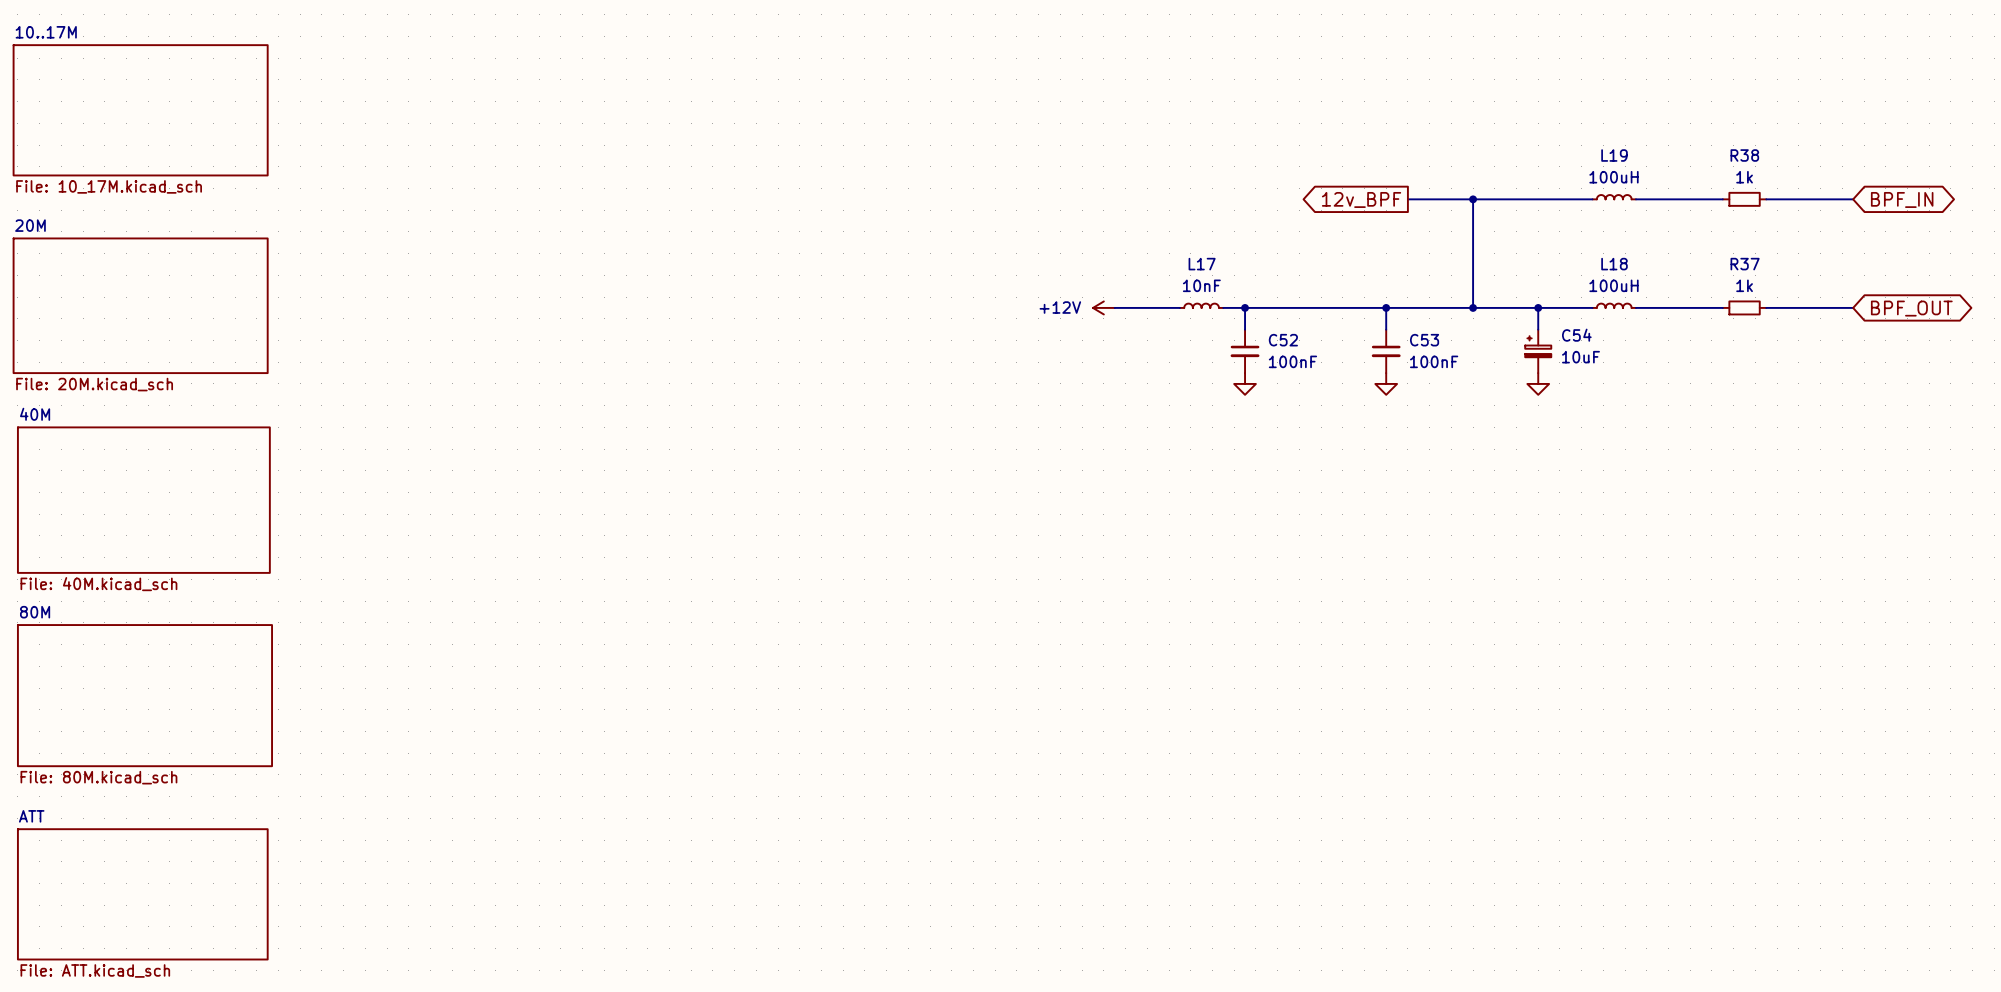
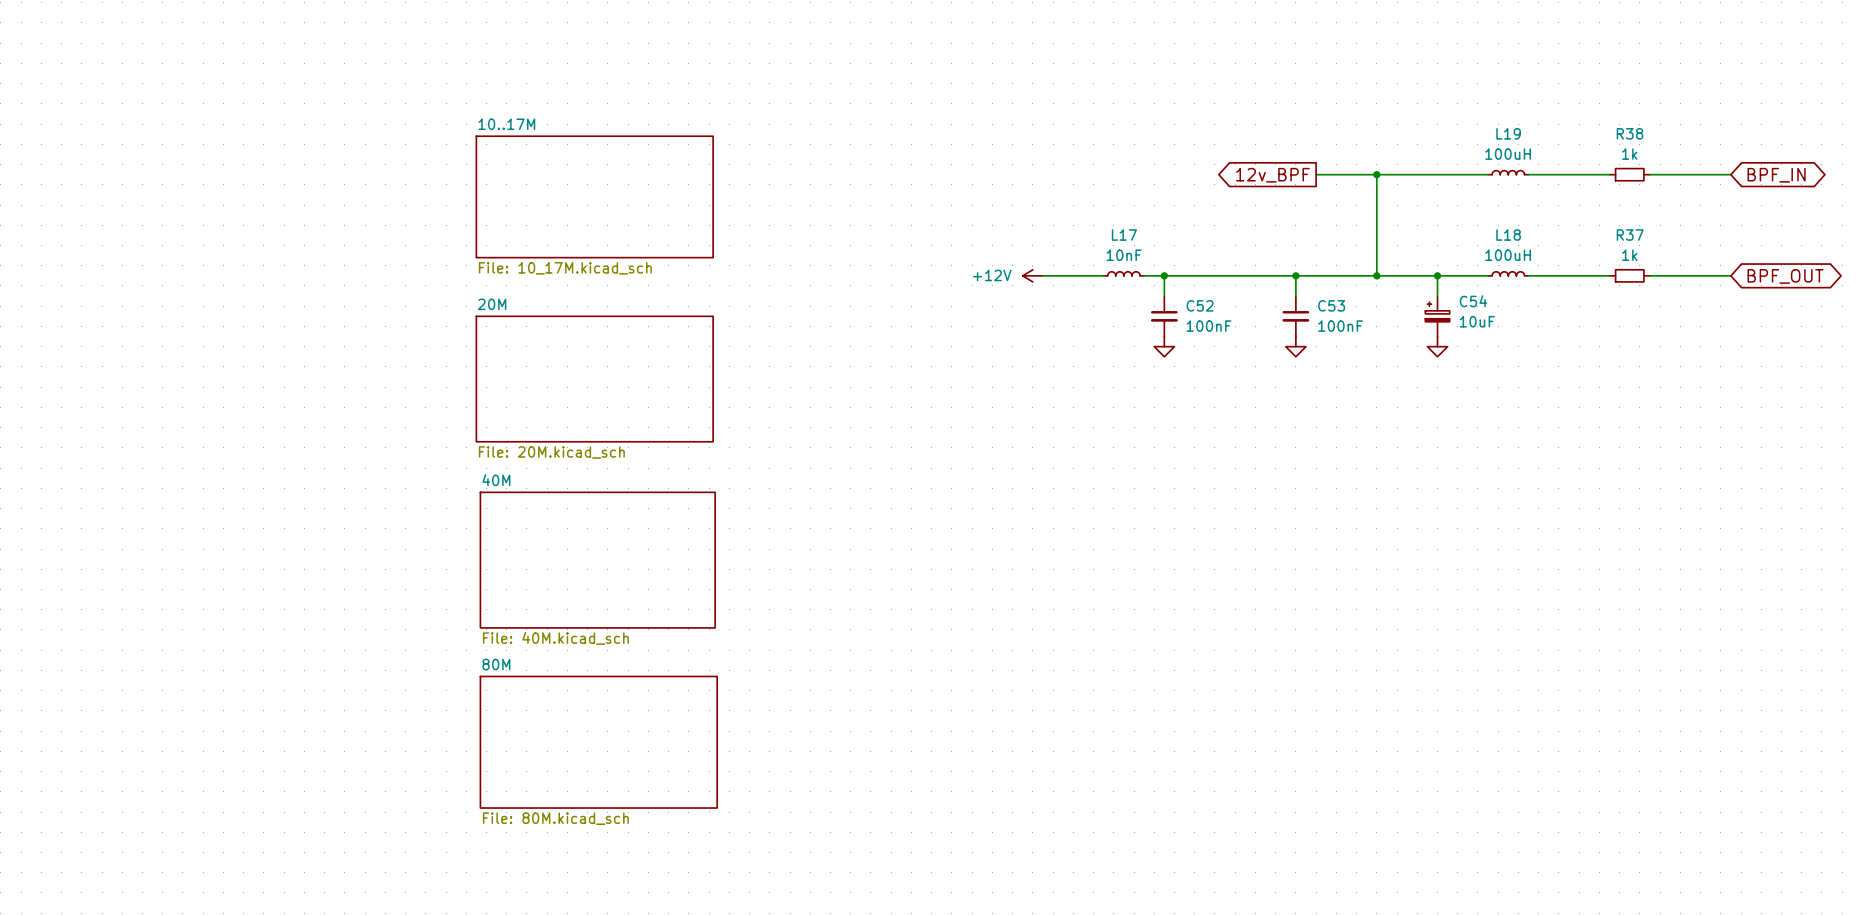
sheet 10..17M position: (140, 110) -> (594, 196)
sheet 20M position: (140, 305) -> (594, 379)
sheet 40M position: (143, 500) -> (597, 560)
sheet 80M position: (144, 695) -> (598, 742)
sheet ATT: File: ATT.kicad_sch (142, 894) -> none

